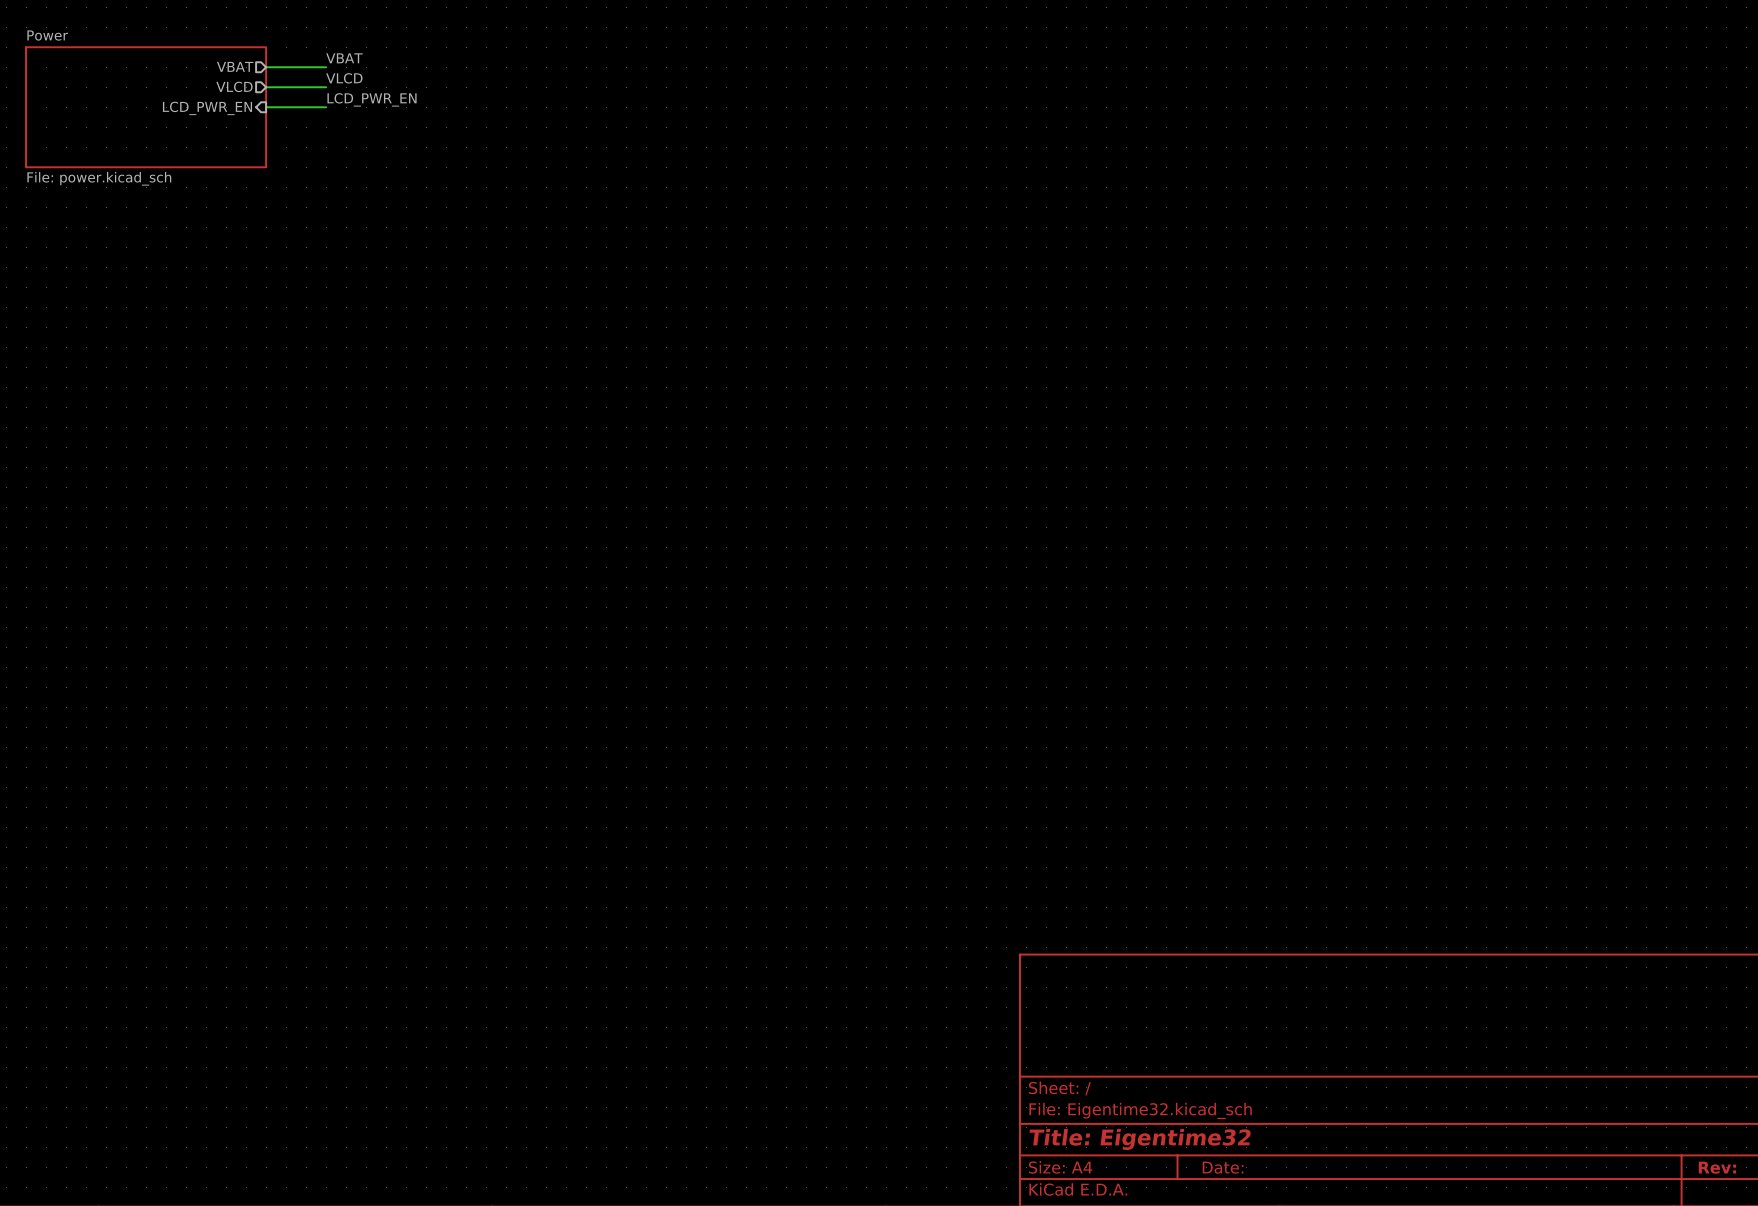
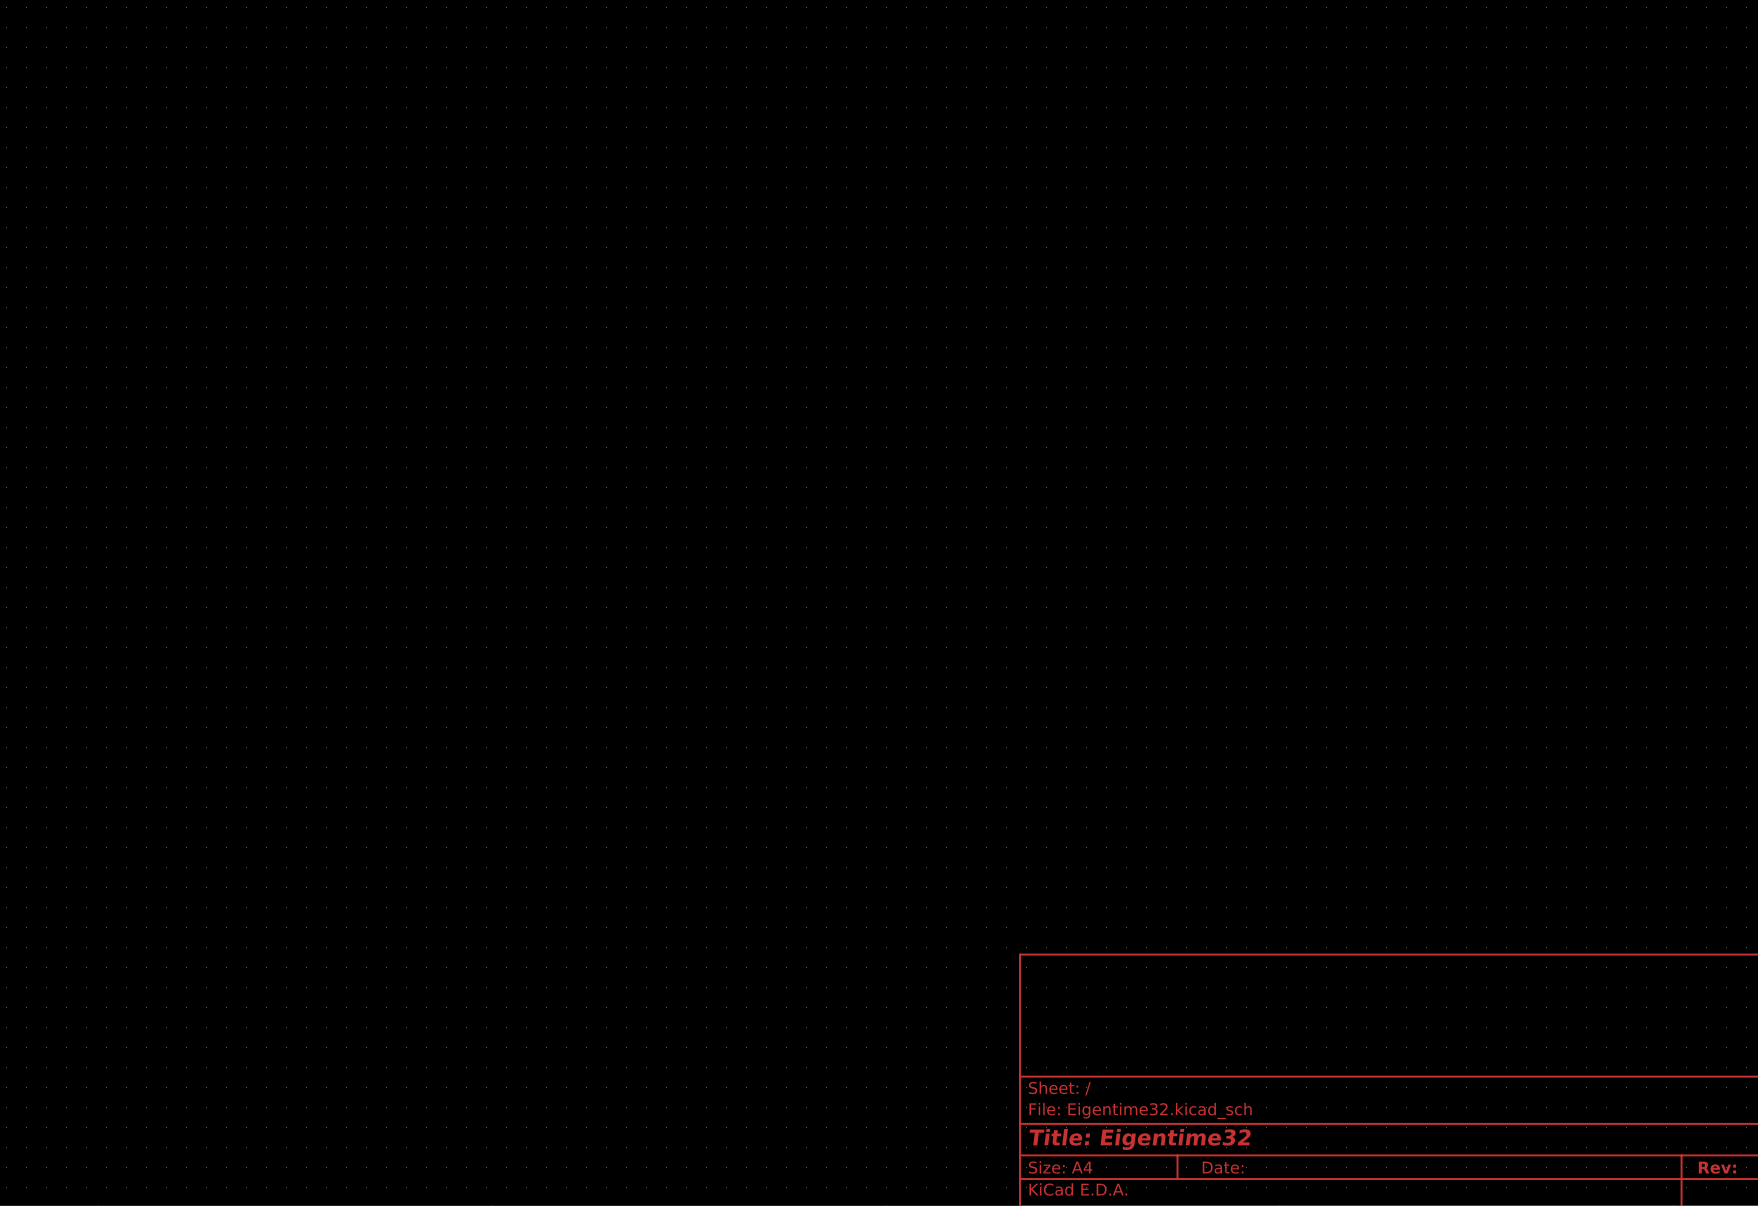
label: VBAT (344, 58) -> none
sheet pin: VBAT (235, 66) -> none
wire: (266, 67) (326, 67) -> none
label: VLCD (344, 78) -> none
sheet pin: VLCD (234, 86) -> none
wire: (266, 87) (326, 87) -> none
label: LCD_PWR_EN (372, 99) -> none
sheet Power: File: power.kicad_sch (146, 107) -> none
wire: (266, 107) (326, 107) -> none
sheet pin: LCD_PWR_EN (207, 108) -> none

